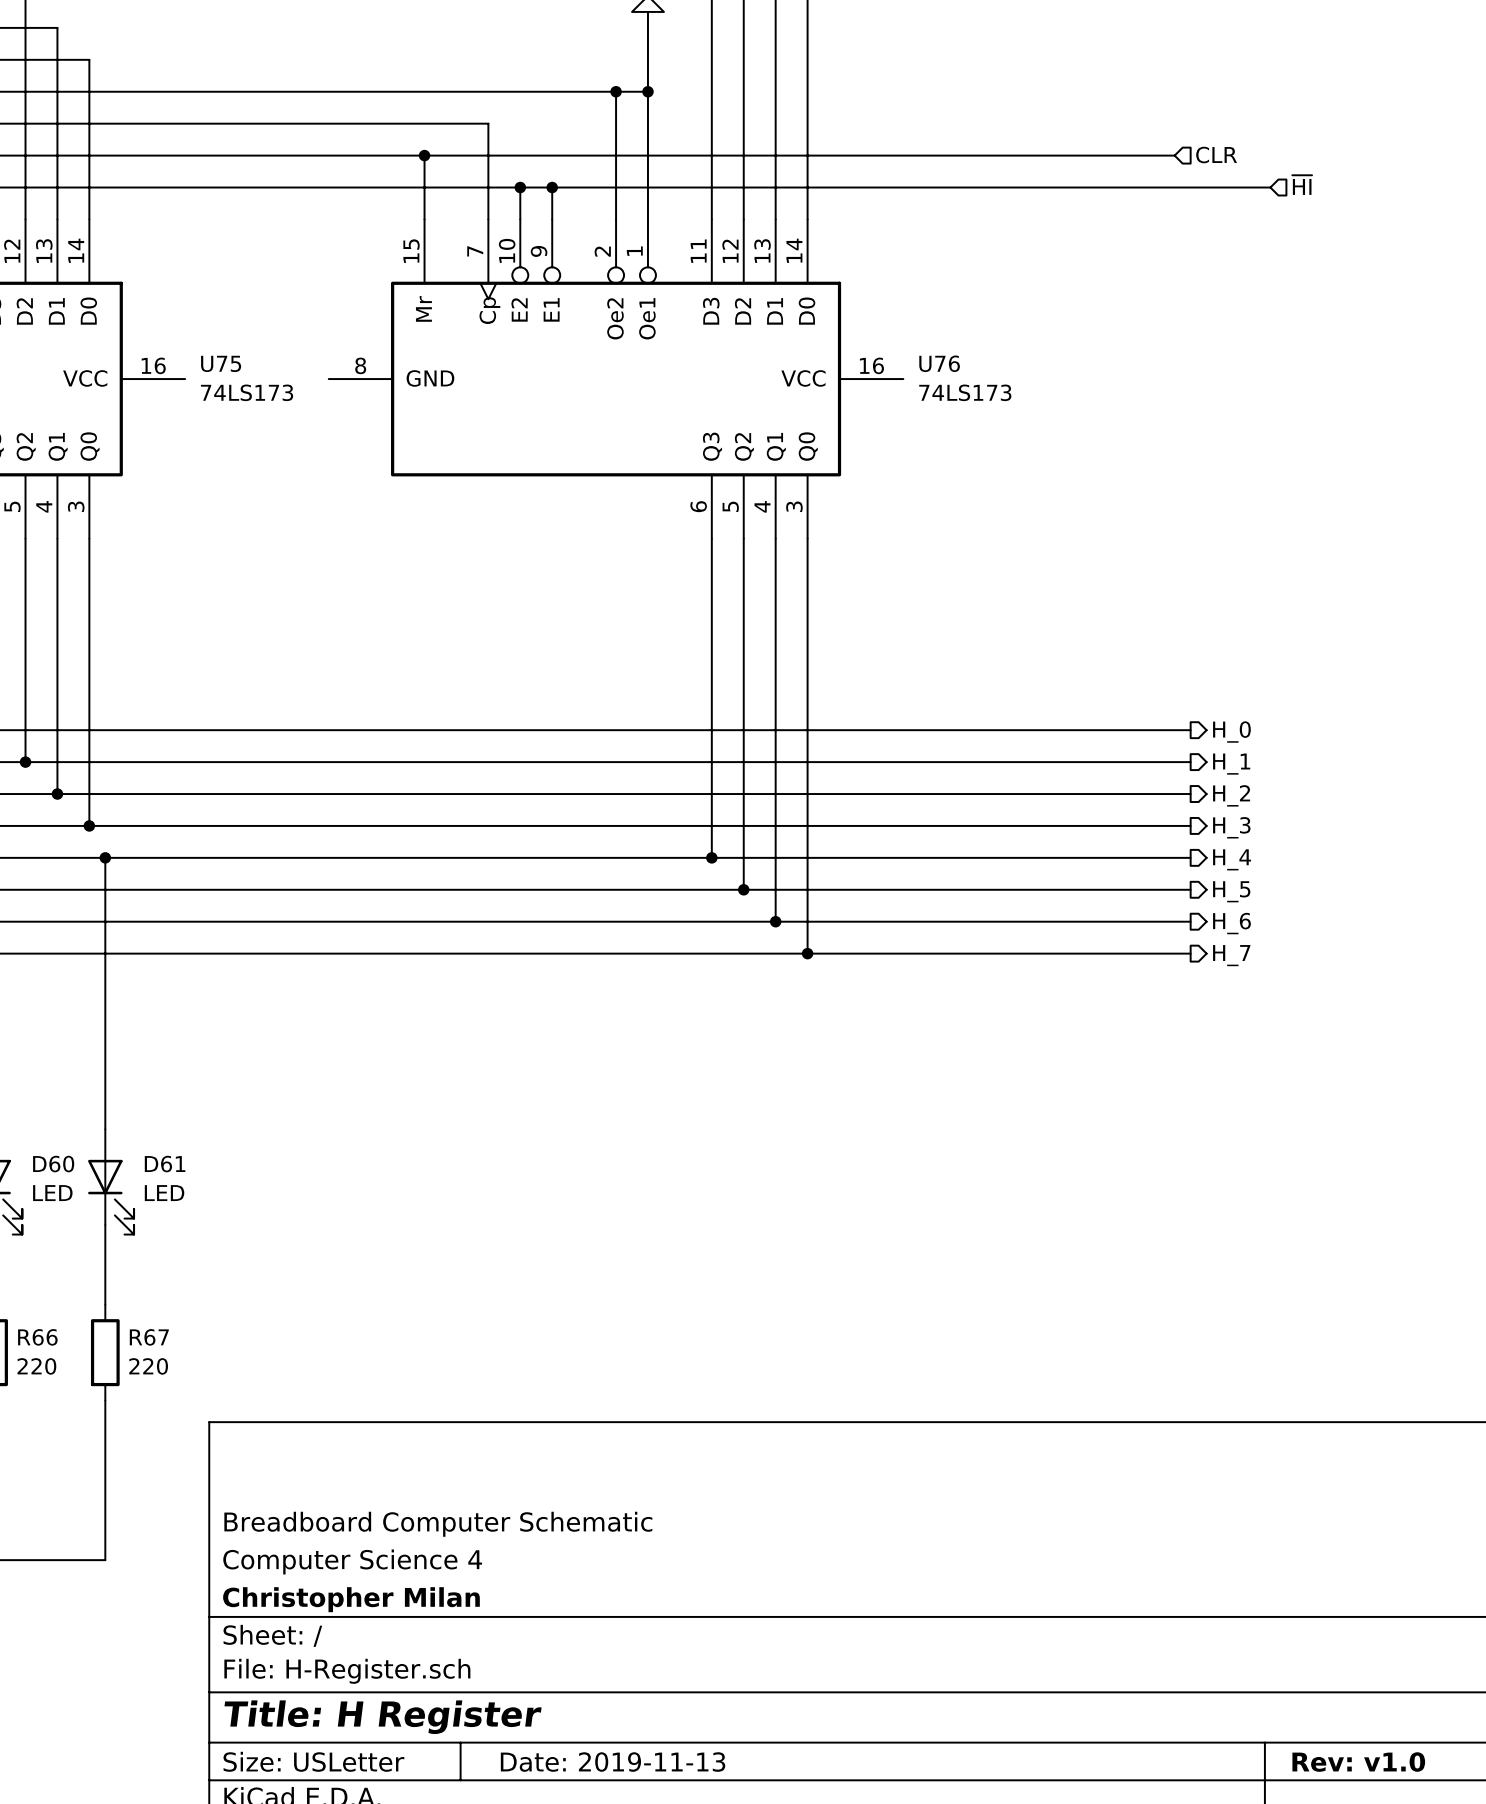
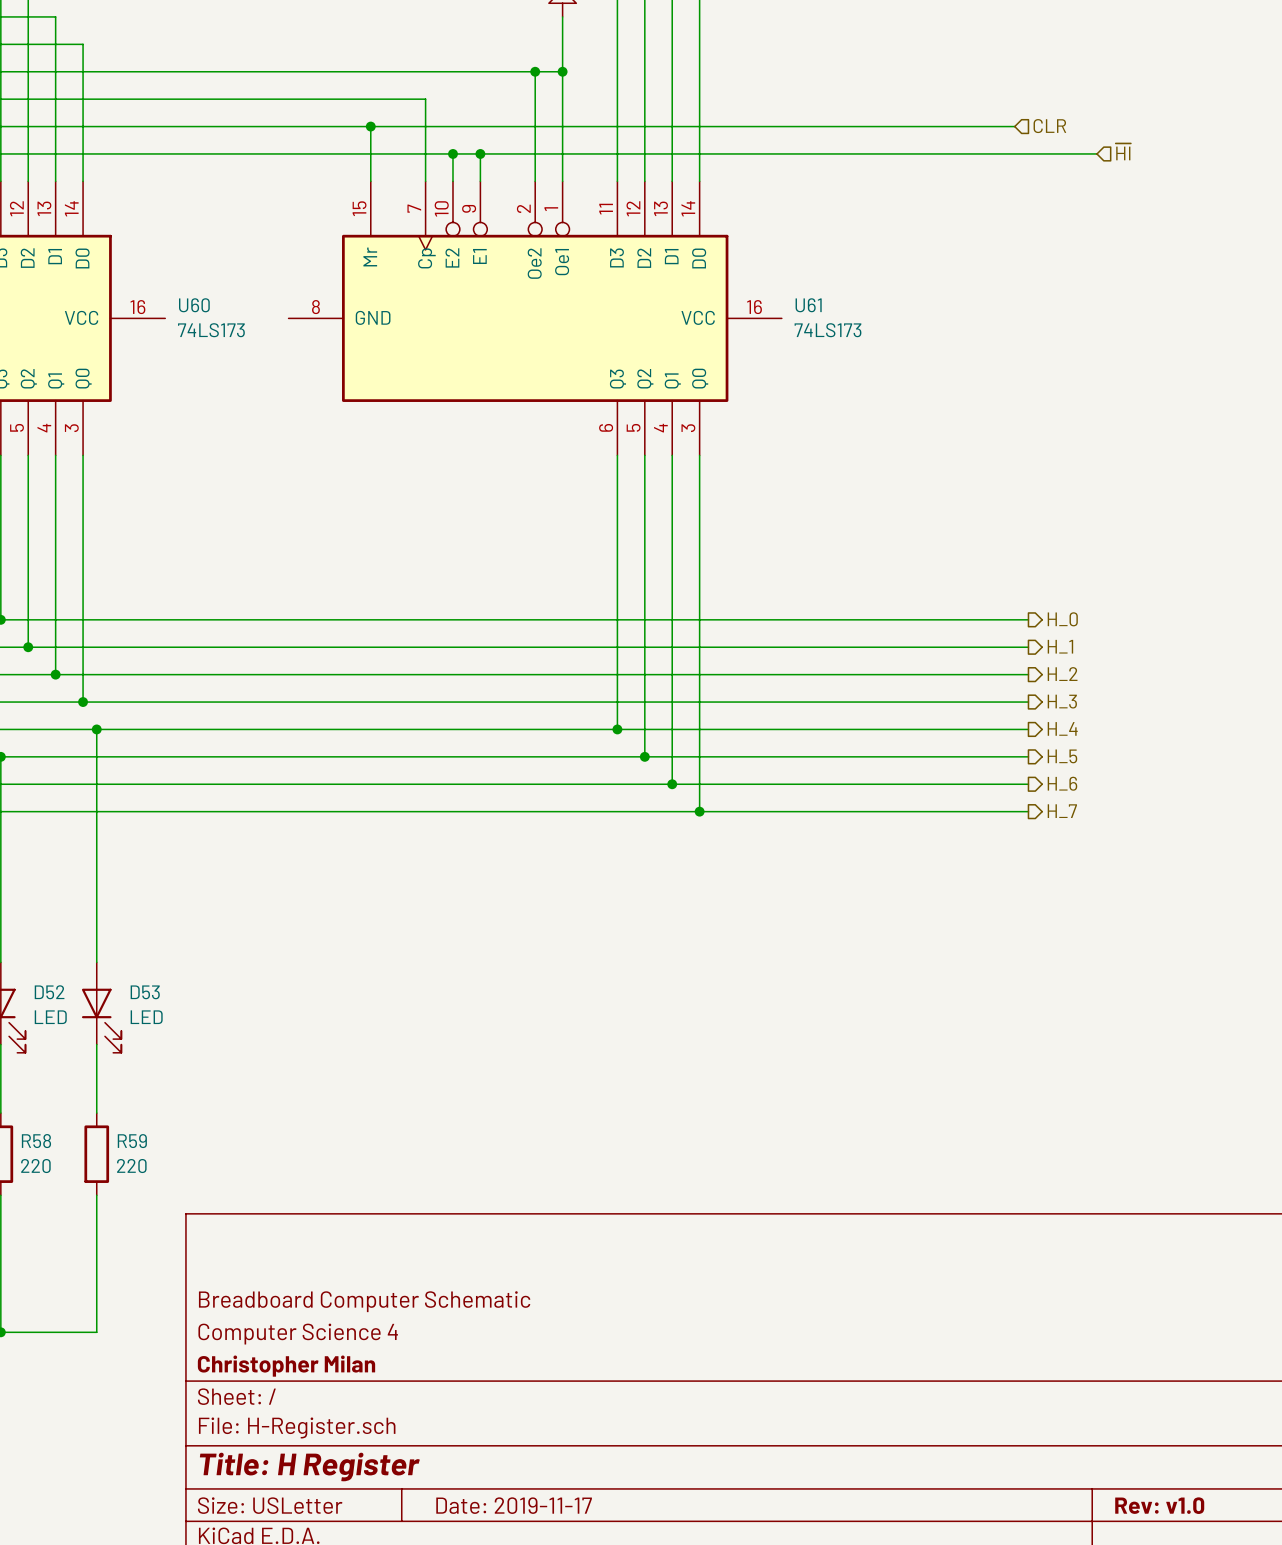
U75 name: U75 (221, 363) -> U60 (194, 305)
U76 name: U76 (939, 363) -> U61 (808, 305)
D60 name: D60 (53, 1164) -> D52 (49, 992)
D61 name: D61 (165, 1164) -> D53 (145, 992)
R66 name: R66 (37, 1337) -> R58 (36, 1141)
R67 name: R67 (149, 1337) -> R59 (132, 1141)
title block: Date: 2019-11-13 (613, 1762) -> Date: 2019-11-17 (514, 1505)

